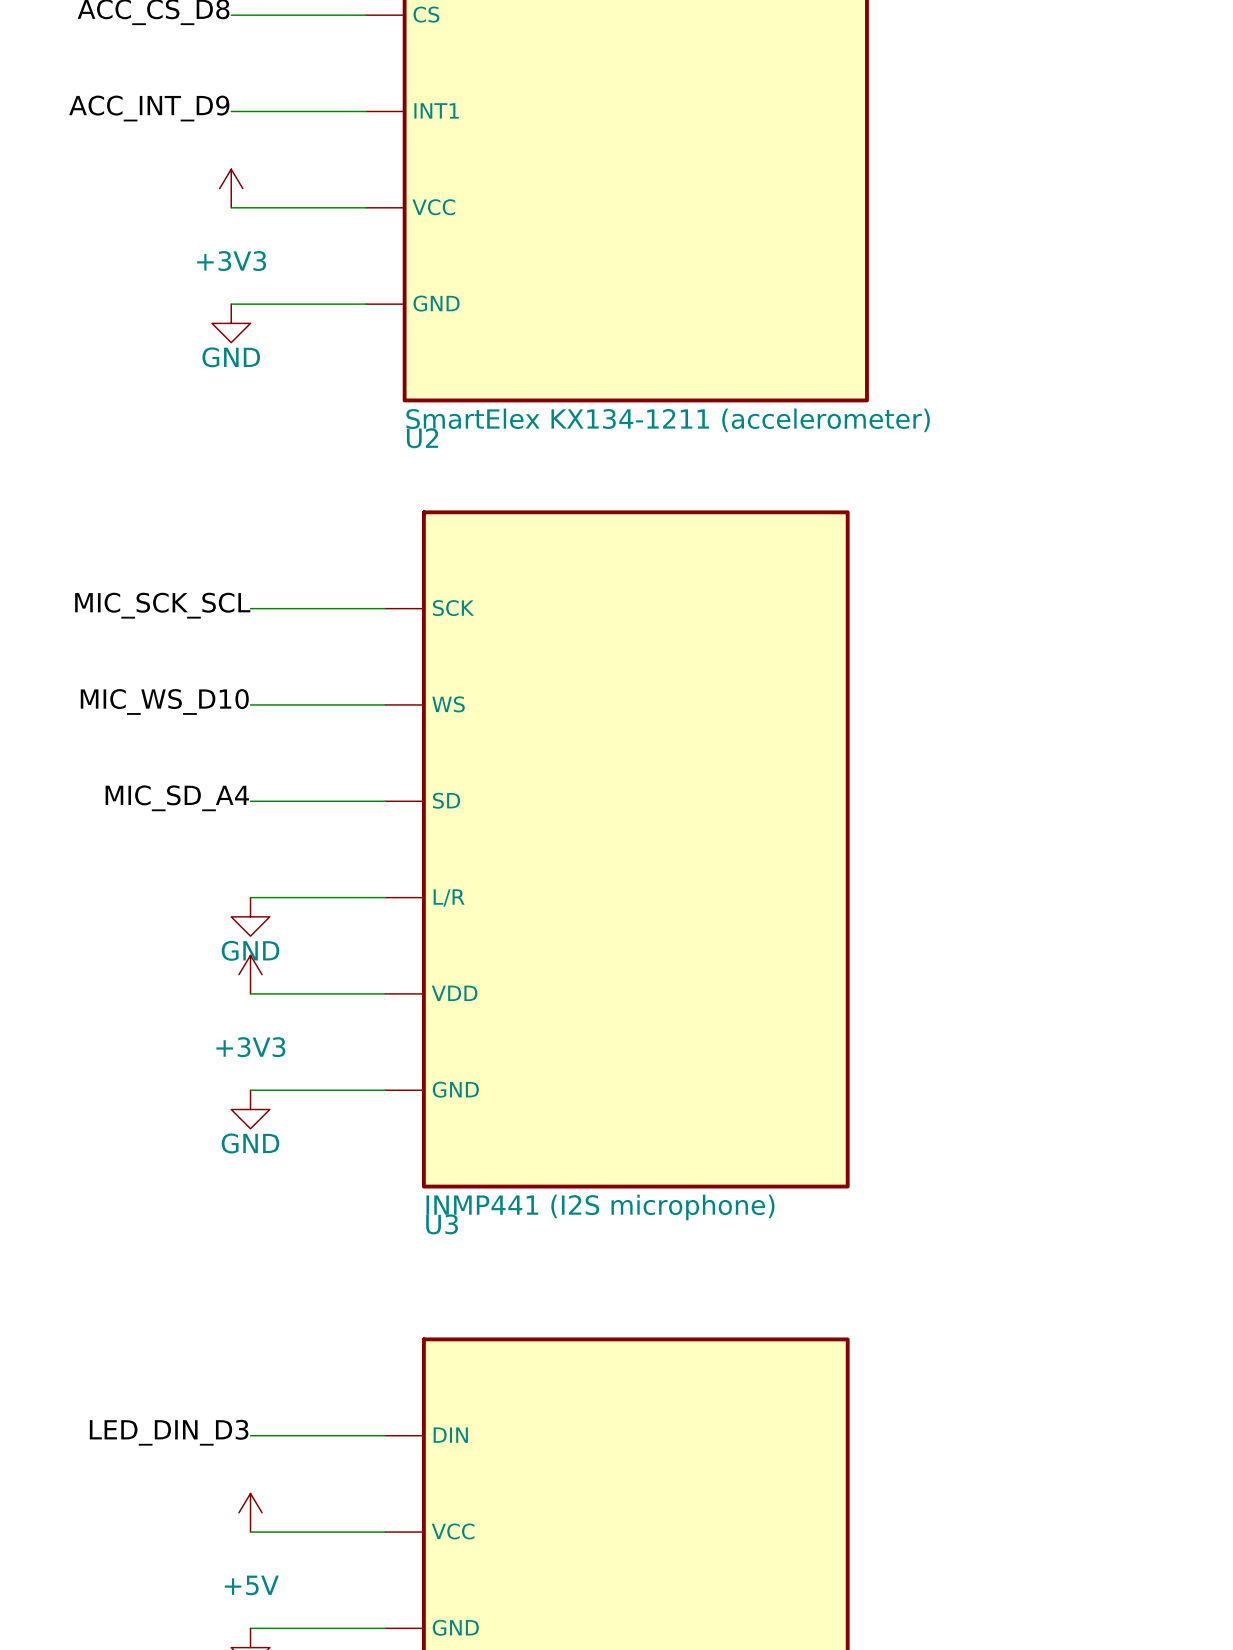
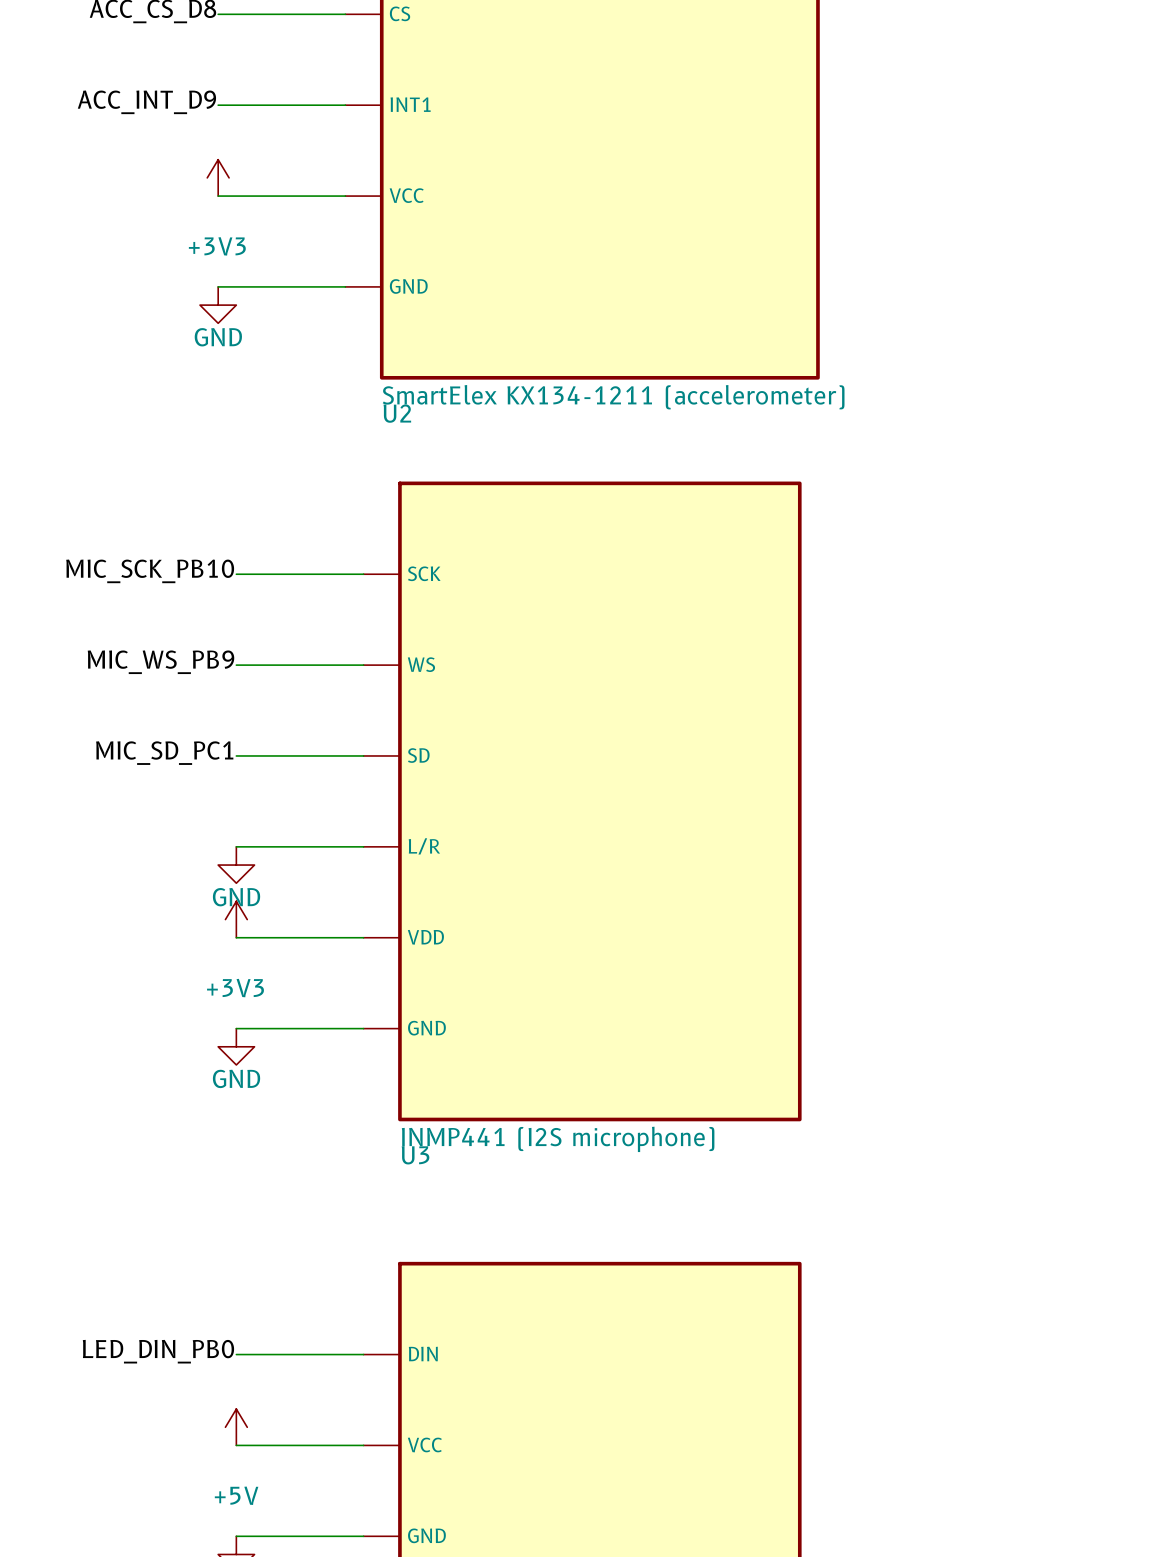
label: MIC_SCK_SCL (162, 605) -> MIC_SCK_PB10 (150, 571)
label: MIC_WS_D10 (164, 701) -> MIC_WS_PB9 (160, 662)
label: MIC_SD_A4 (177, 798) -> MIC_SD_PC1 (164, 753)
label: LED_DIN_D3 (169, 1432) -> LED_DIN_PB0 (158, 1351)

